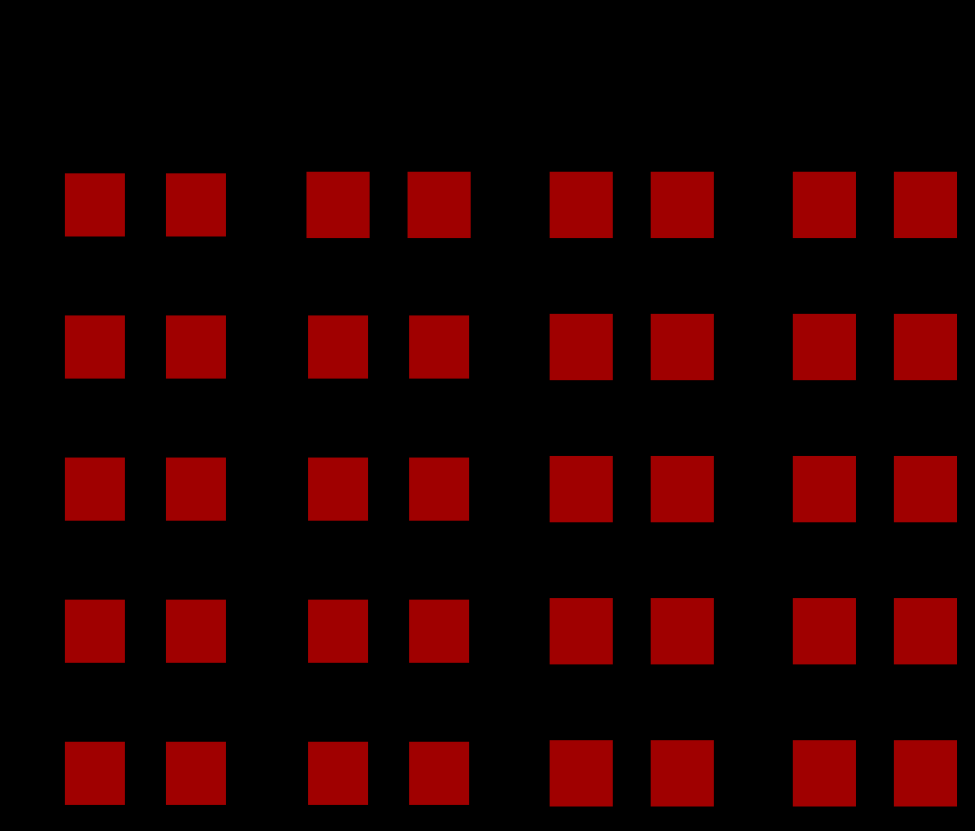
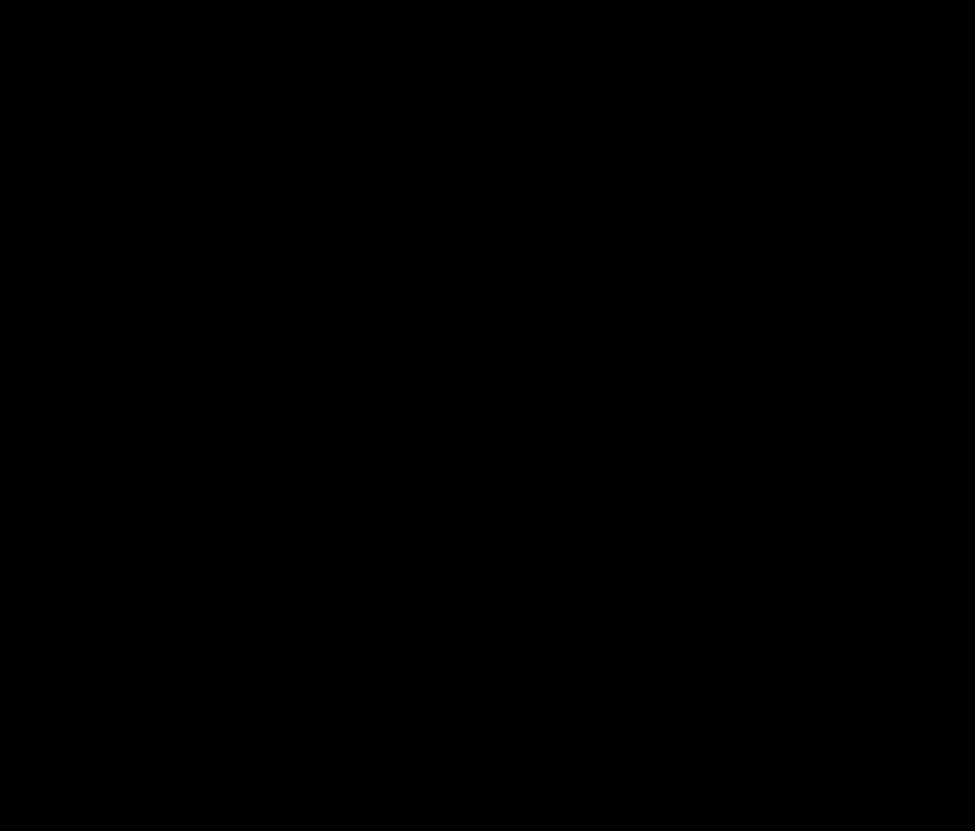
part: (145, 204) -> none
part: (388, 204) -> none
part: (631, 204) -> none
part: (874, 204) -> none
part: (145, 347) -> none
part: (388, 347) -> none
part: (631, 347) -> none
part: (874, 347) -> none
part: (145, 489) -> none
part: (388, 489) -> none
part: (631, 489) -> none
part: (874, 489) -> none
part: (145, 631) -> none
part: (388, 631) -> none
part: (631, 631) -> none
part: (874, 631) -> none
part: (145, 773) -> none
part: (388, 773) -> none
part: (631, 773) -> none
part: (874, 773) -> none

